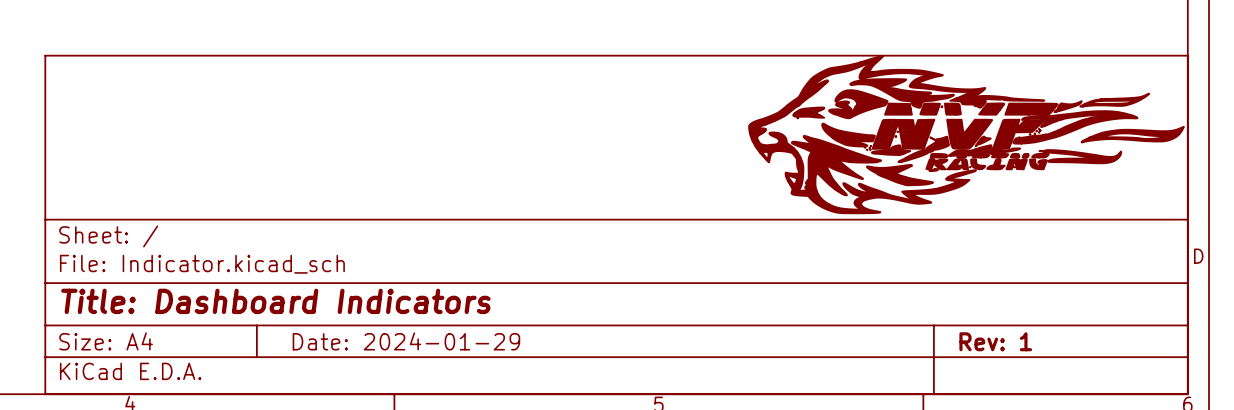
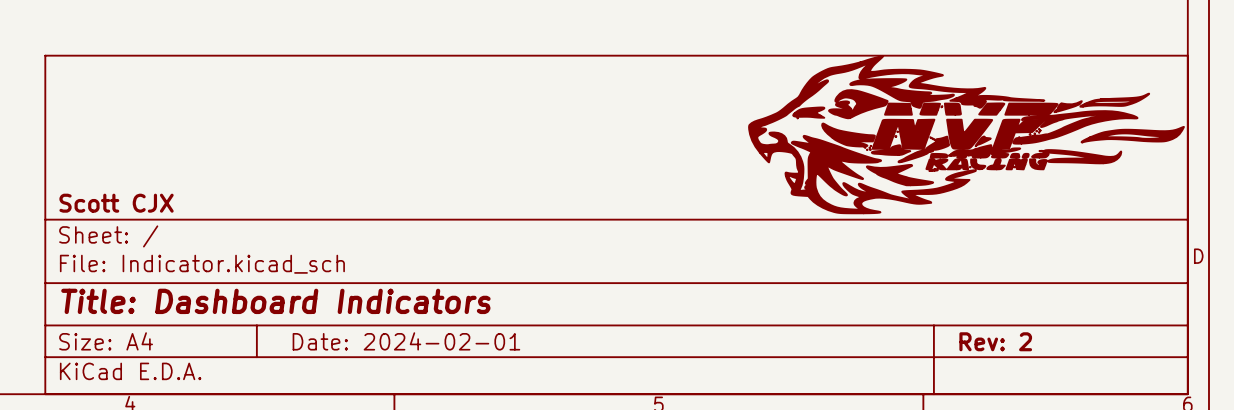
title block: none -> Scott CJX (116, 203)
title block: Date: 2024-01-29 (406, 341) -> Date: 2024-02-01 (406, 341)
title block: Rev: 1 (995, 341) -> Rev: 2 (995, 341)

